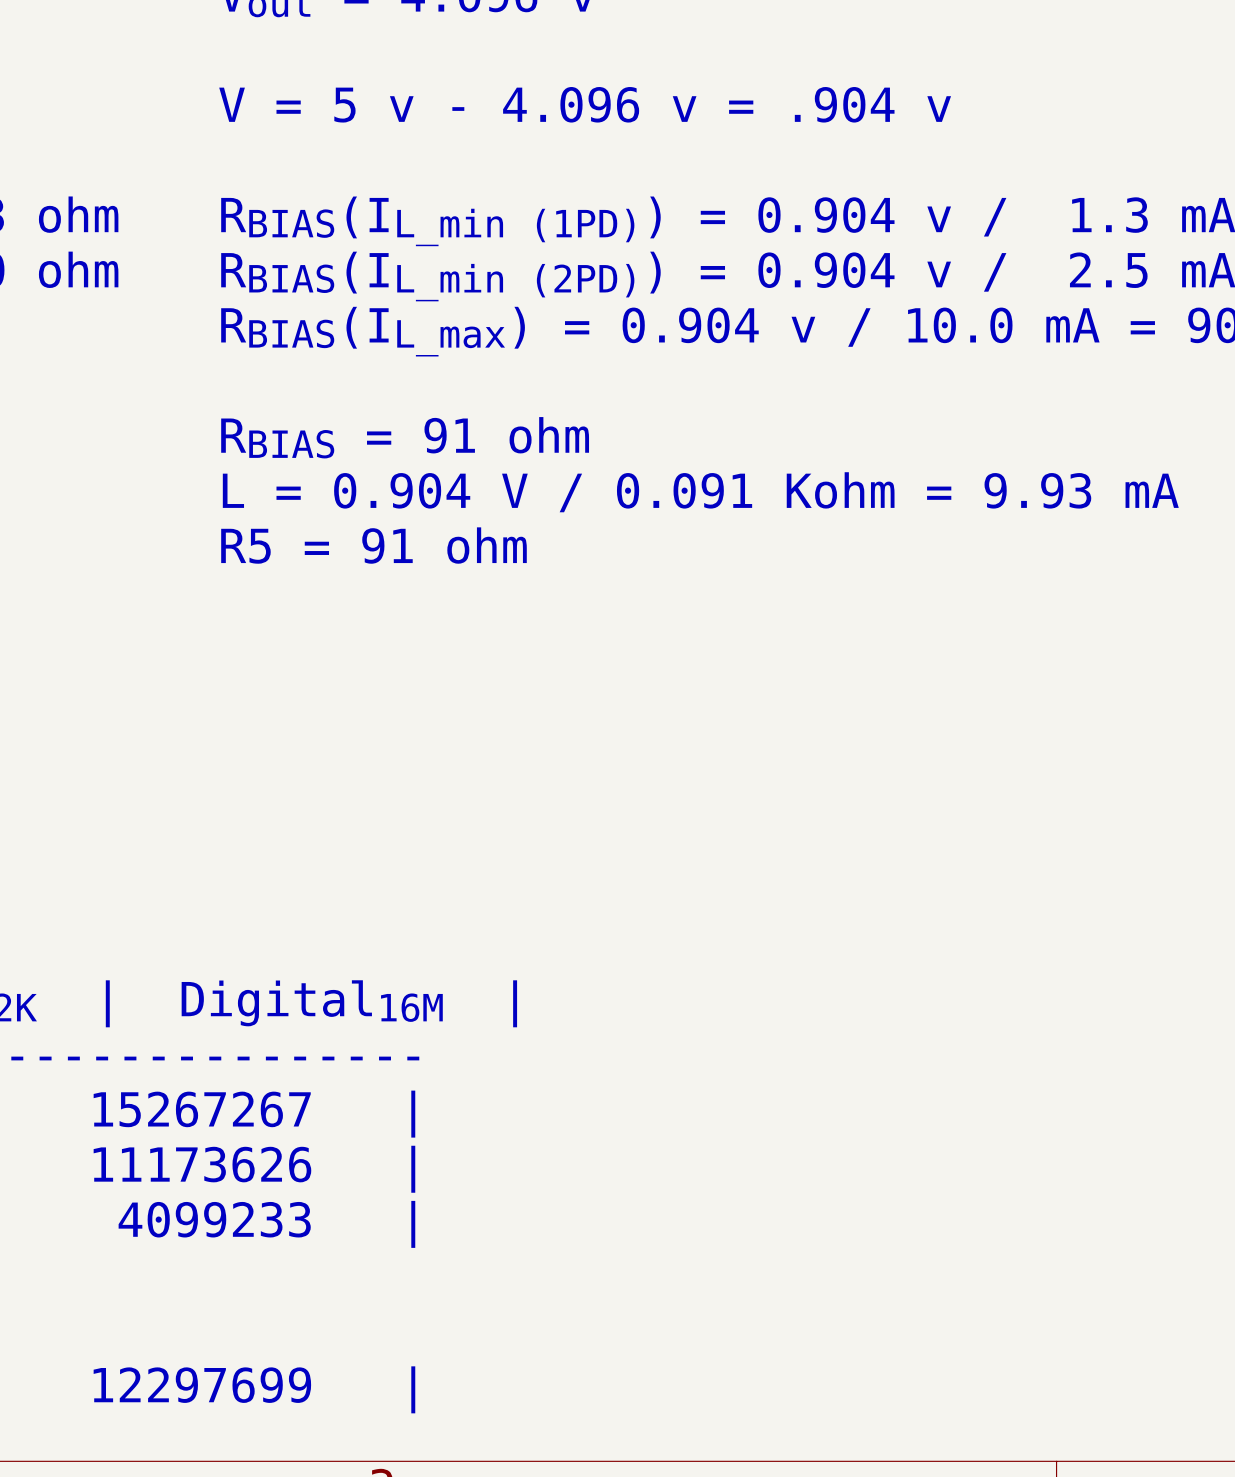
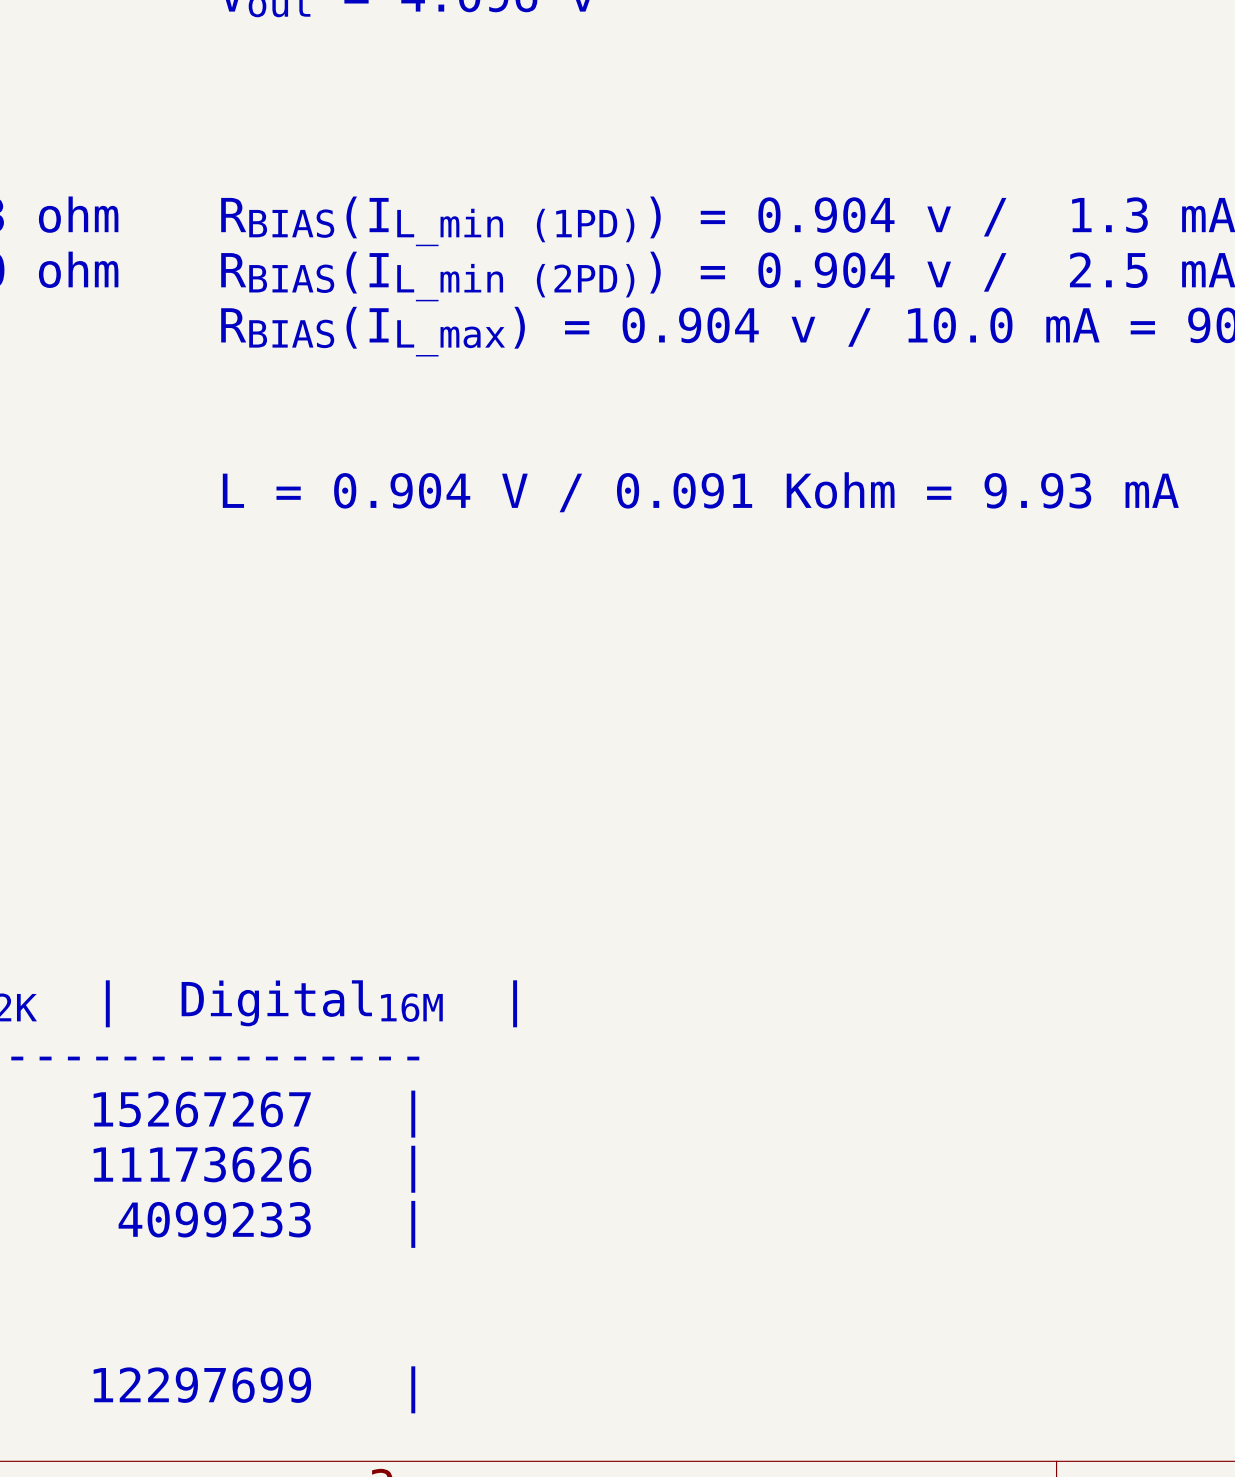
text: V = 5 v - 4.096 v = .904 v (585, 104) -> none
text: RBIAS = 91 ohm (405, 437) -> none
text: R5 = 91 ohm (373, 545) -> none

